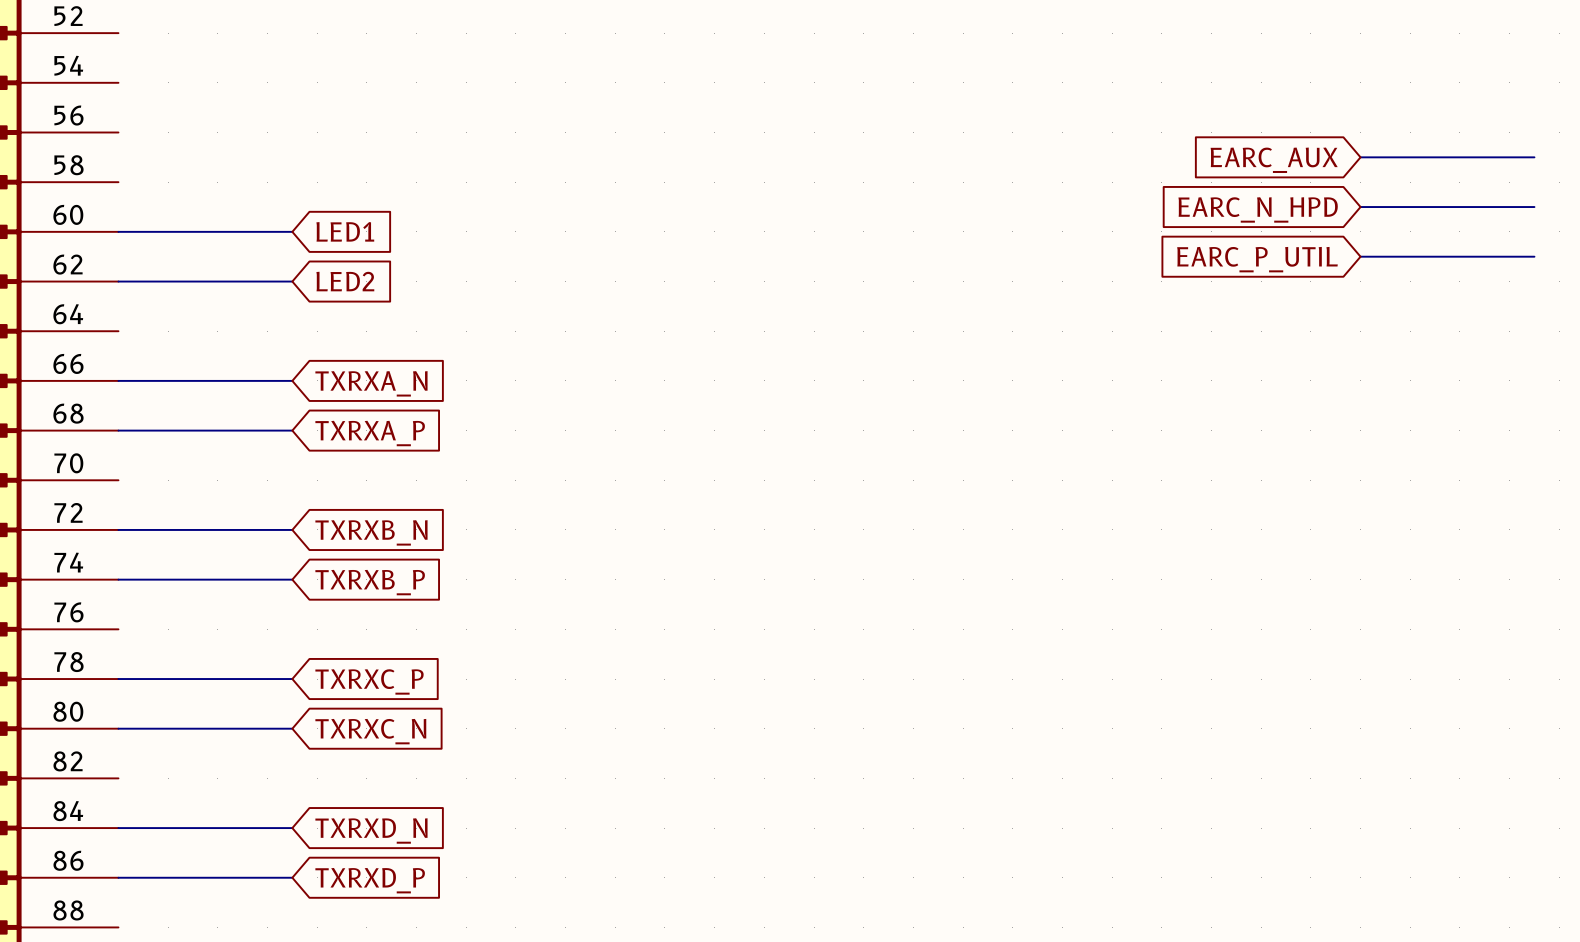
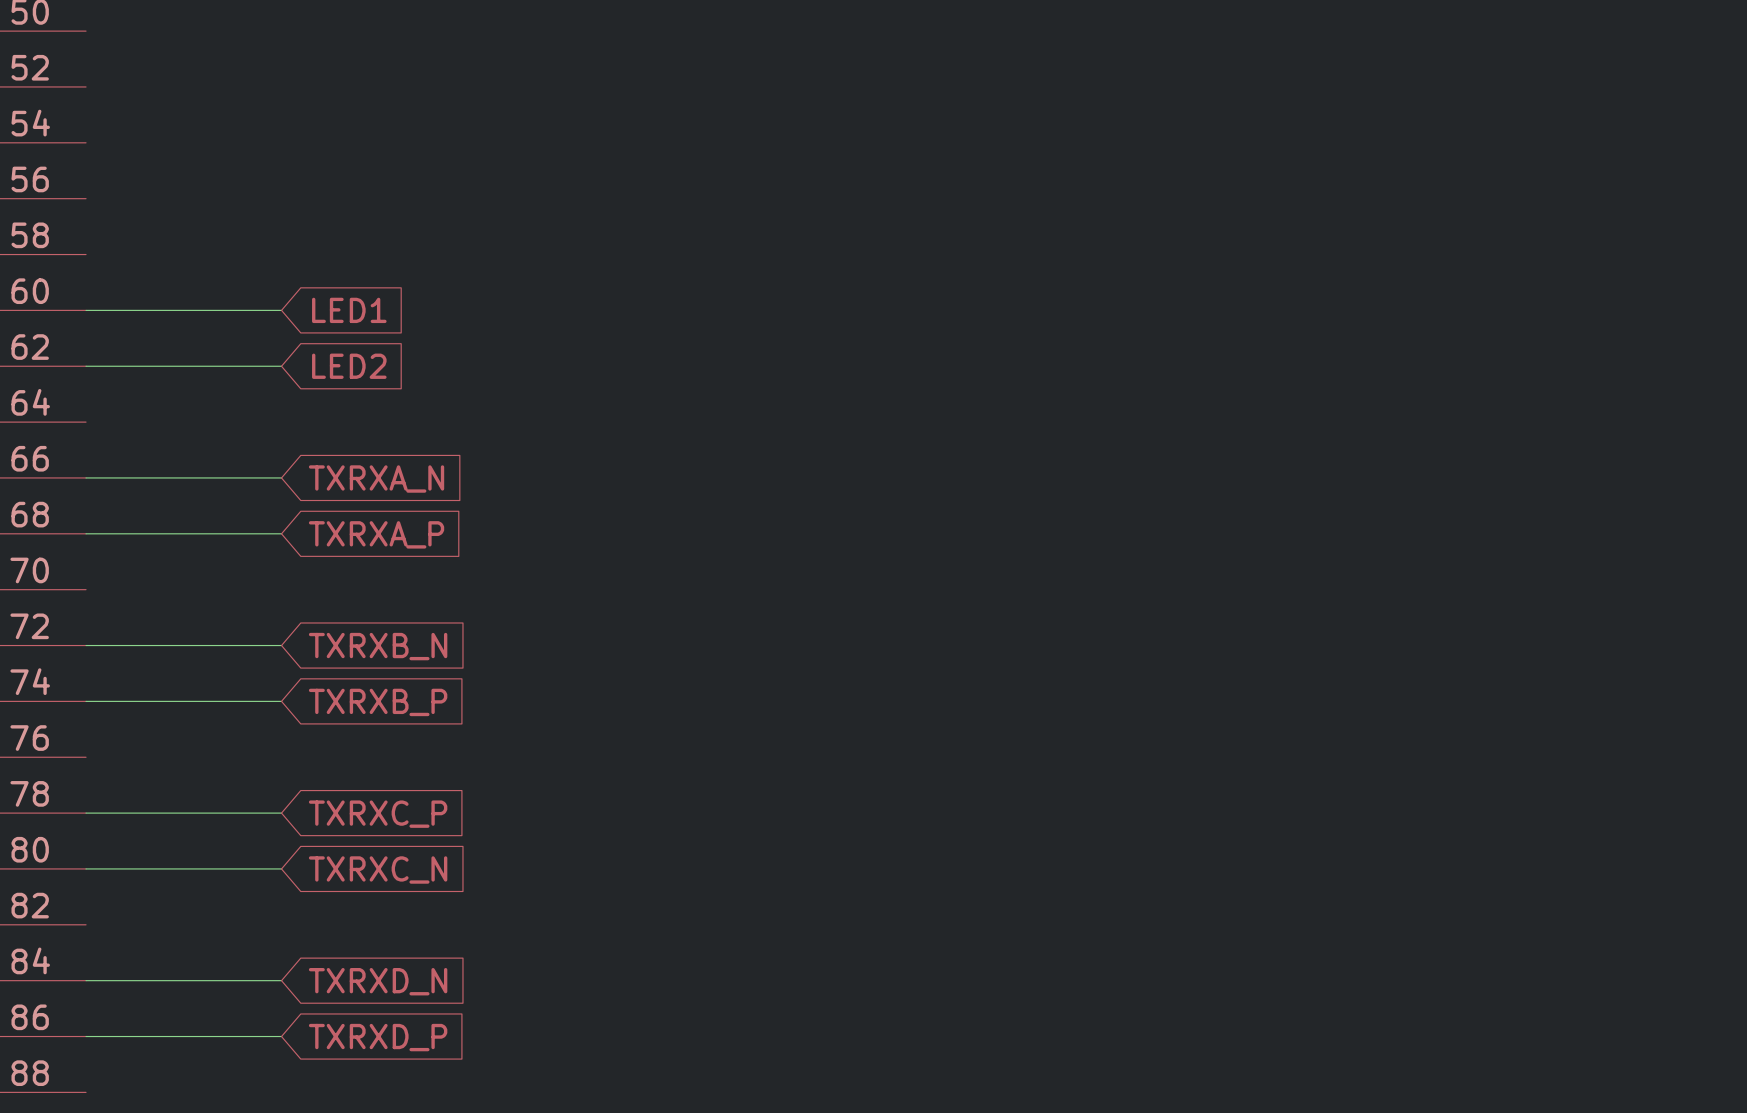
wire: (1360, 157) (1534, 157) -> none
global label: EARC_AUX (1274, 160) -> none
wire: (1360, 207) (1534, 207) -> none
global label: EARC_N_HPD (1258, 209) -> none
wire: (1360, 256) (1534, 256) -> none
global label: EARC_P_UTIL (1257, 259) -> none

